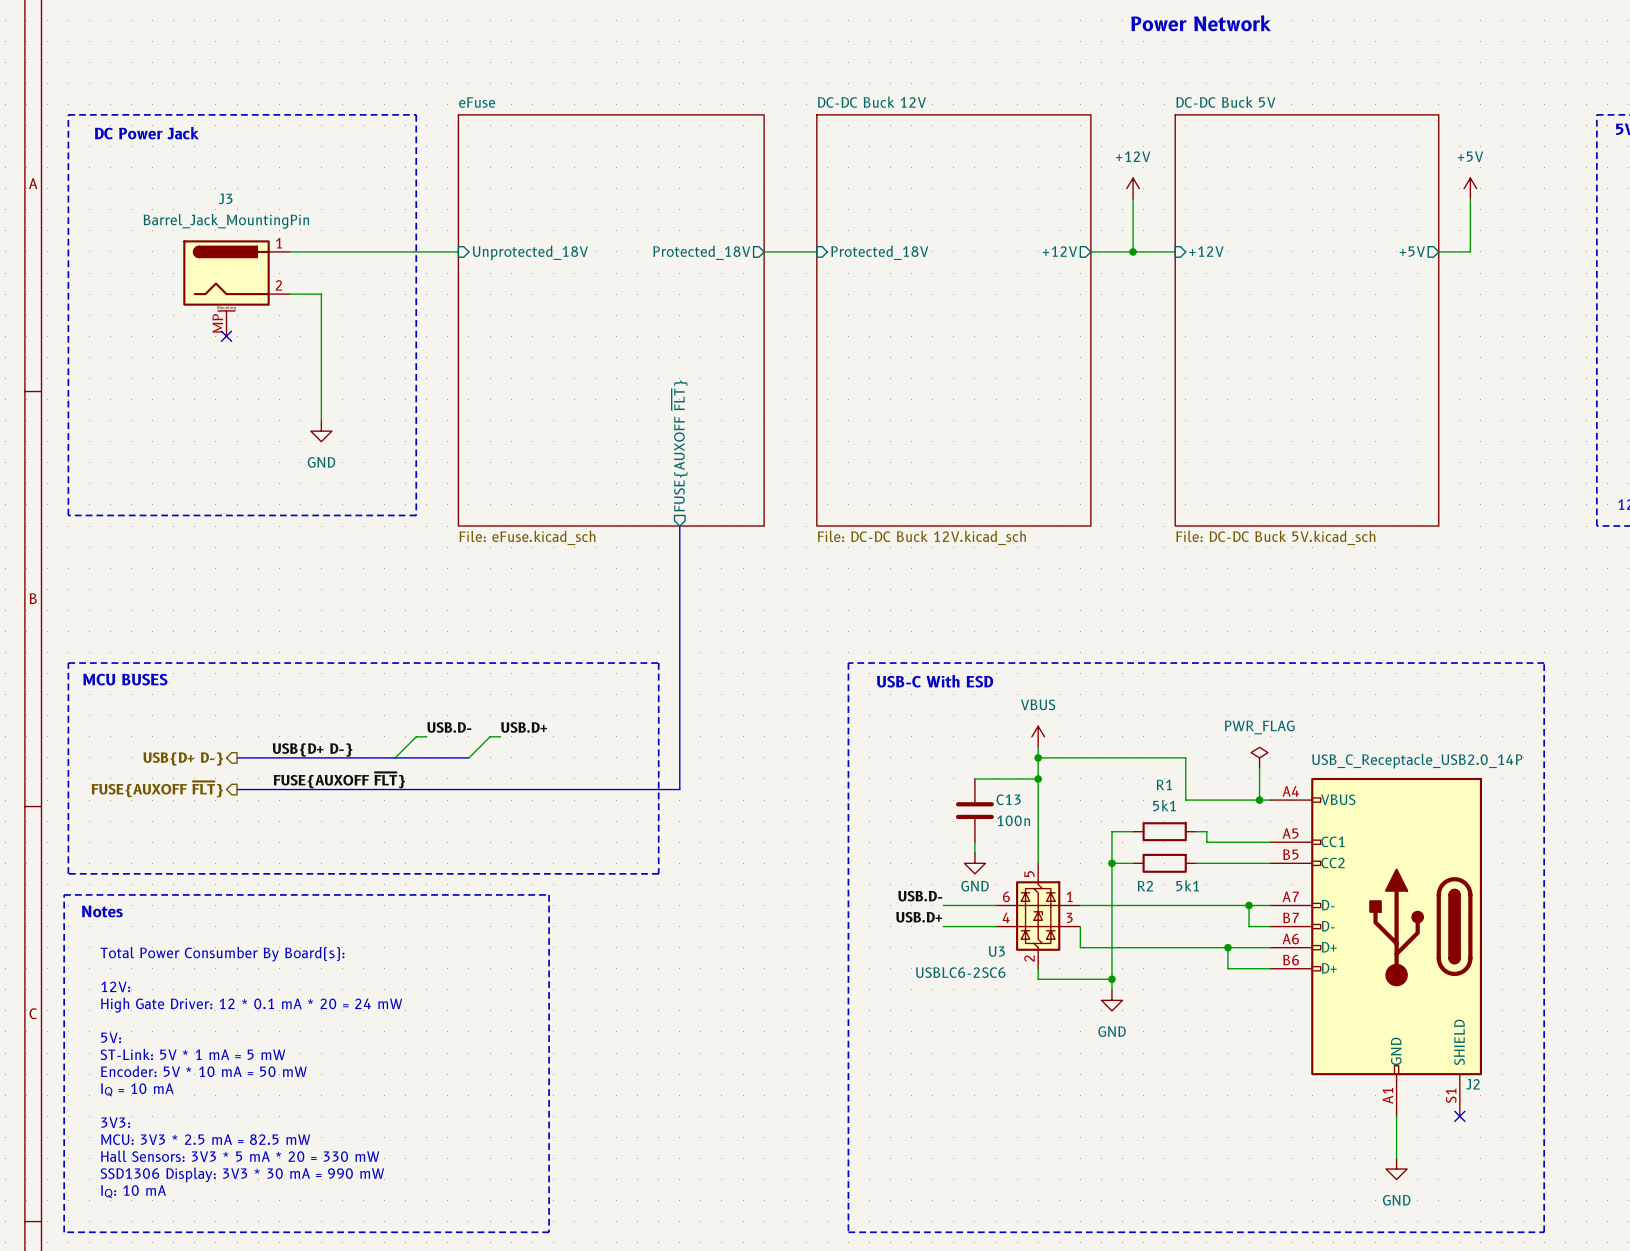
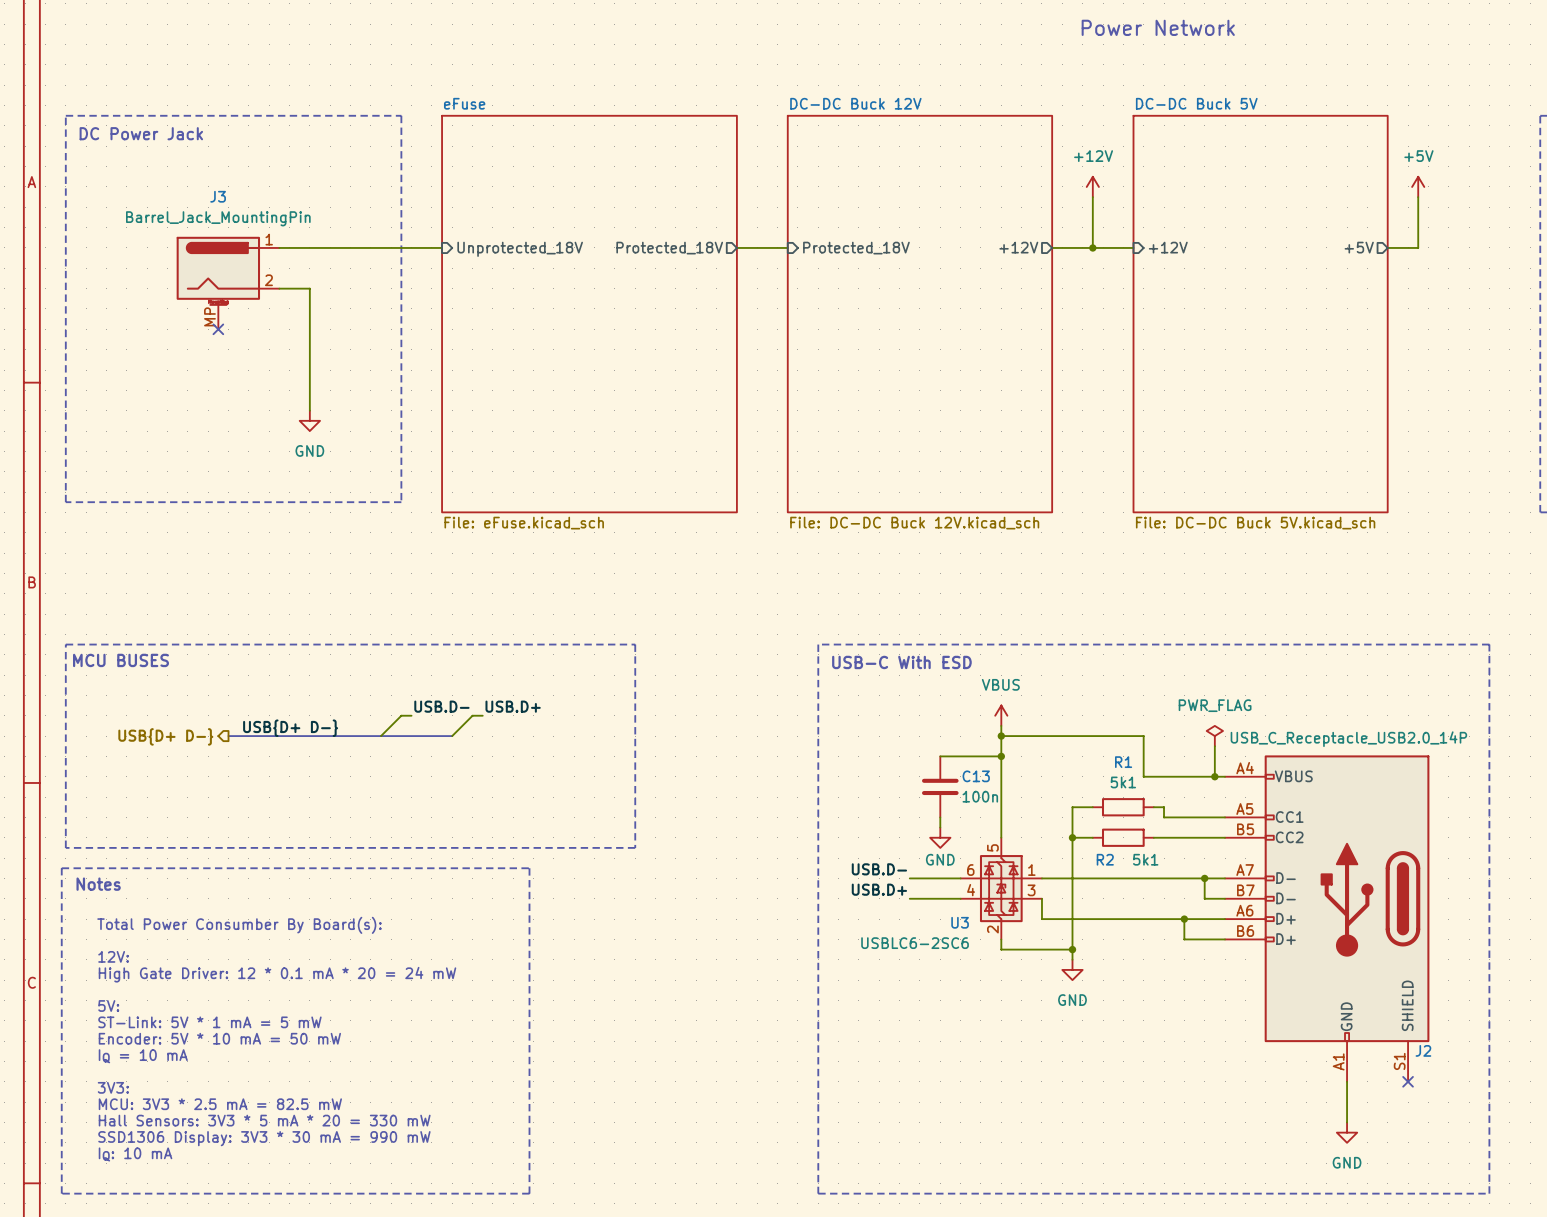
sheet pin: FUSE{AUXOFF ~{FLT}} (679, 445) -> none
bus: (679, 526) (679, 789) (237, 789) -> none
label: FUSE{AUXOFF ~{FLT}} (339, 780) -> none
hierarchical label: FUSE{AUXOFF ~{FLT}} (157, 789) -> none

